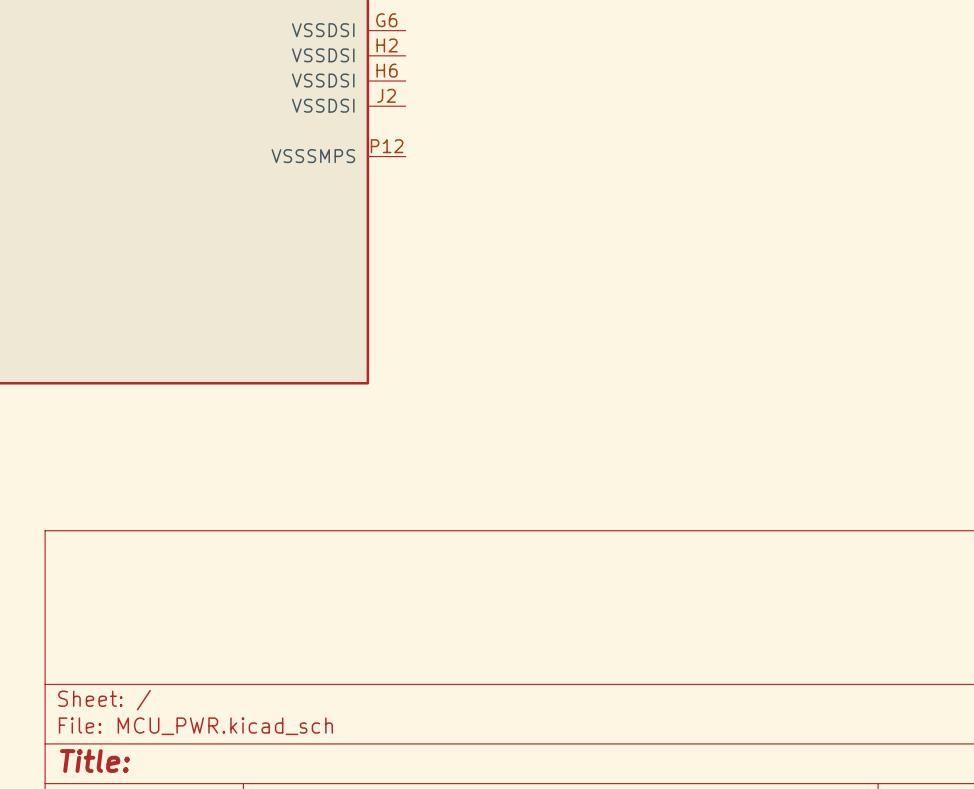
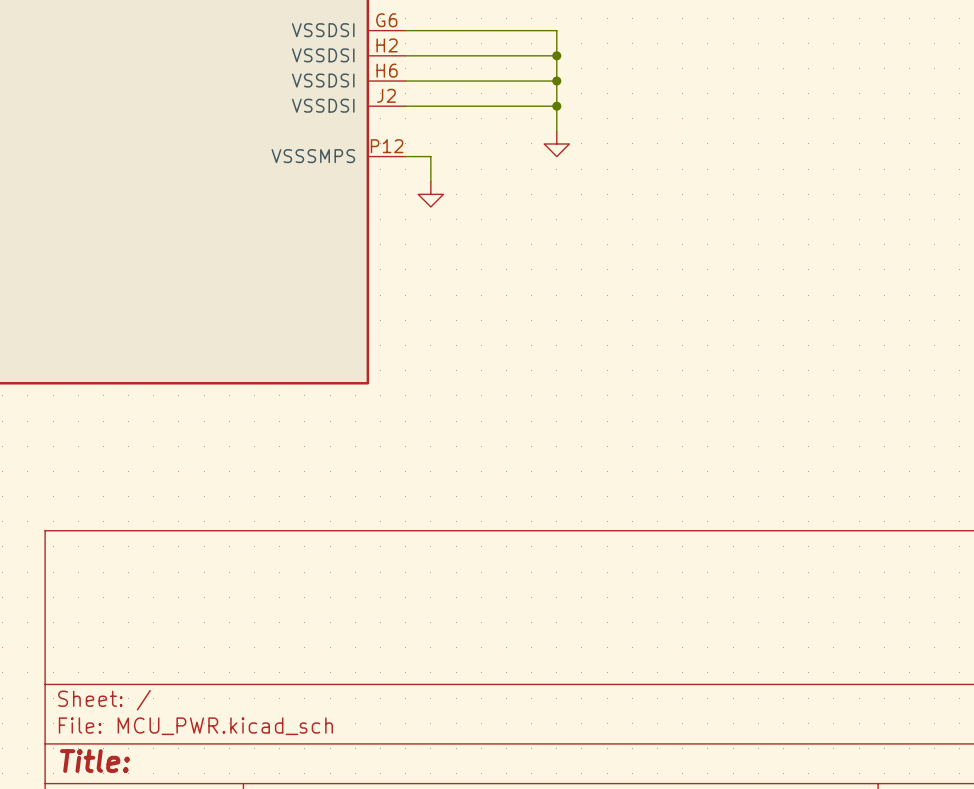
wire: none -> (405, 30) (556, 30) (556, 131)
wire: none -> (405, 55) (556, 55)
junction: none -> (556, 55)
wire: none -> (405, 81) (556, 81)
junction: none -> (556, 81)
wire: none -> (405, 106) (556, 106)
junction: none -> (556, 106)
power symbol: none -> (556, 143)
wire: none -> (405, 156) (430, 156) (430, 181)
power symbol: none -> (430, 194)

